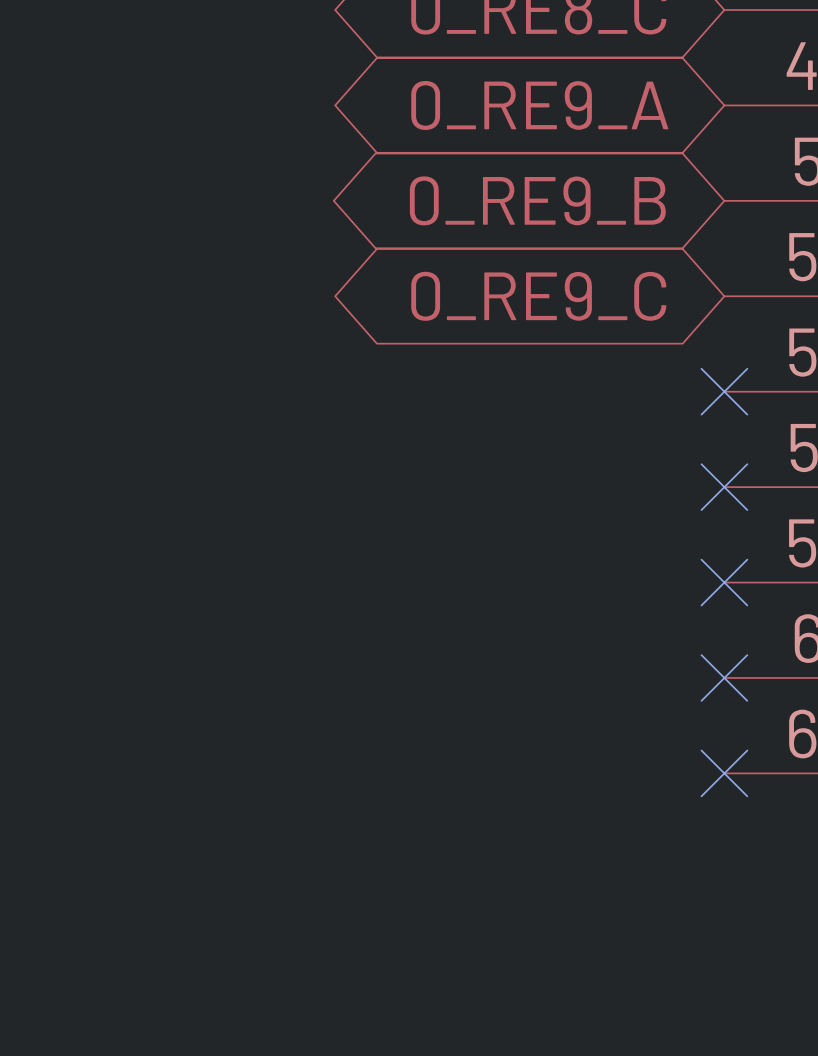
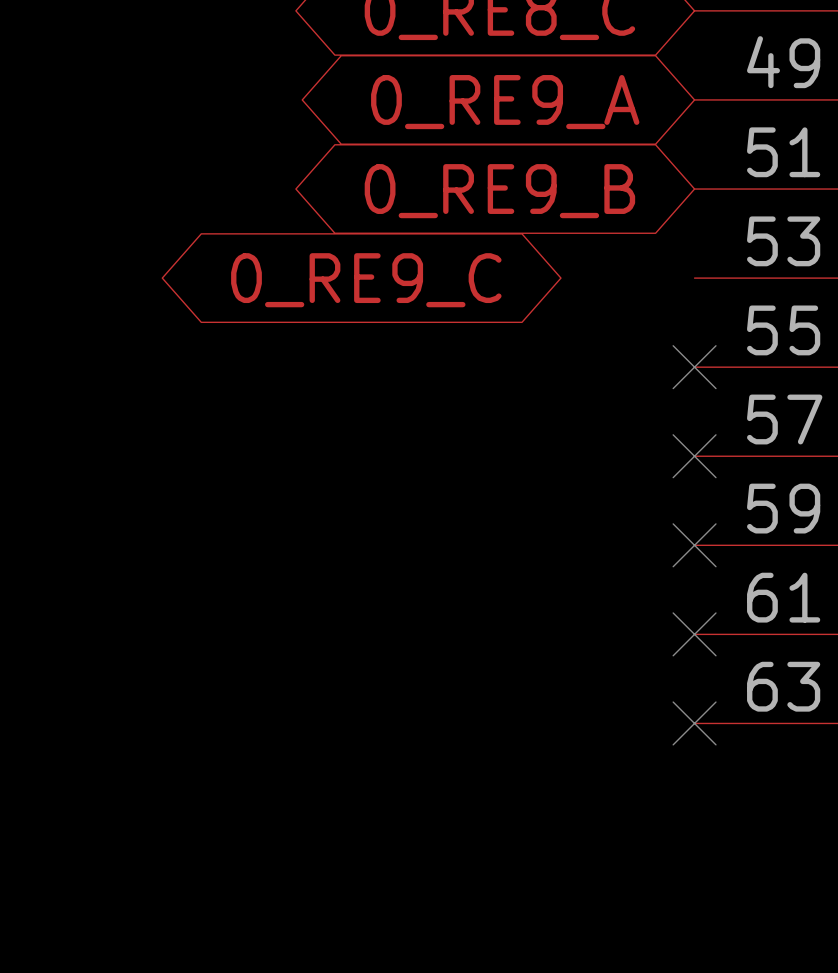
global label position: 0_RE9_C (538, 296) -> 0_RE9_C (366, 280)

